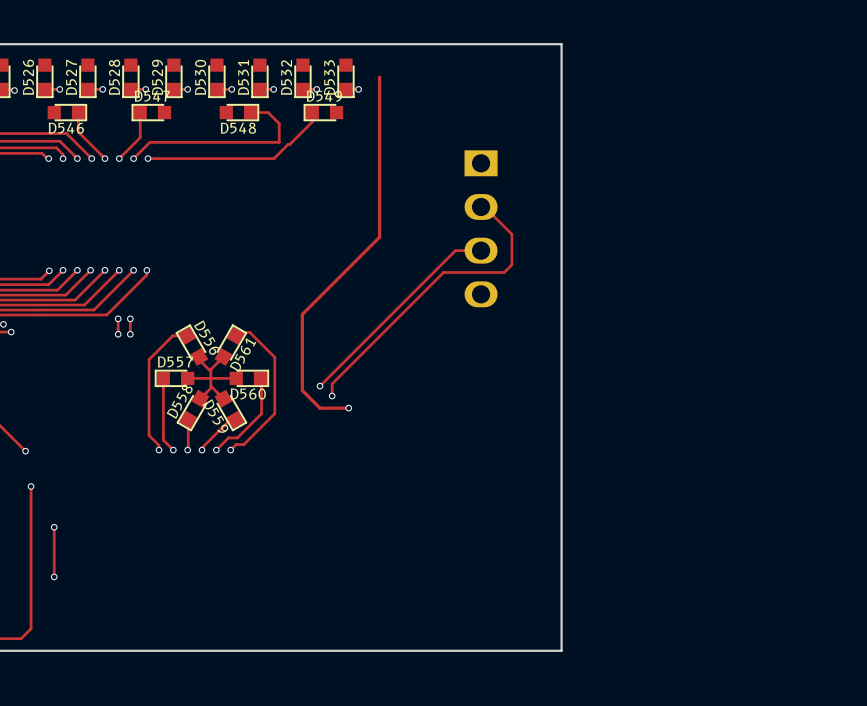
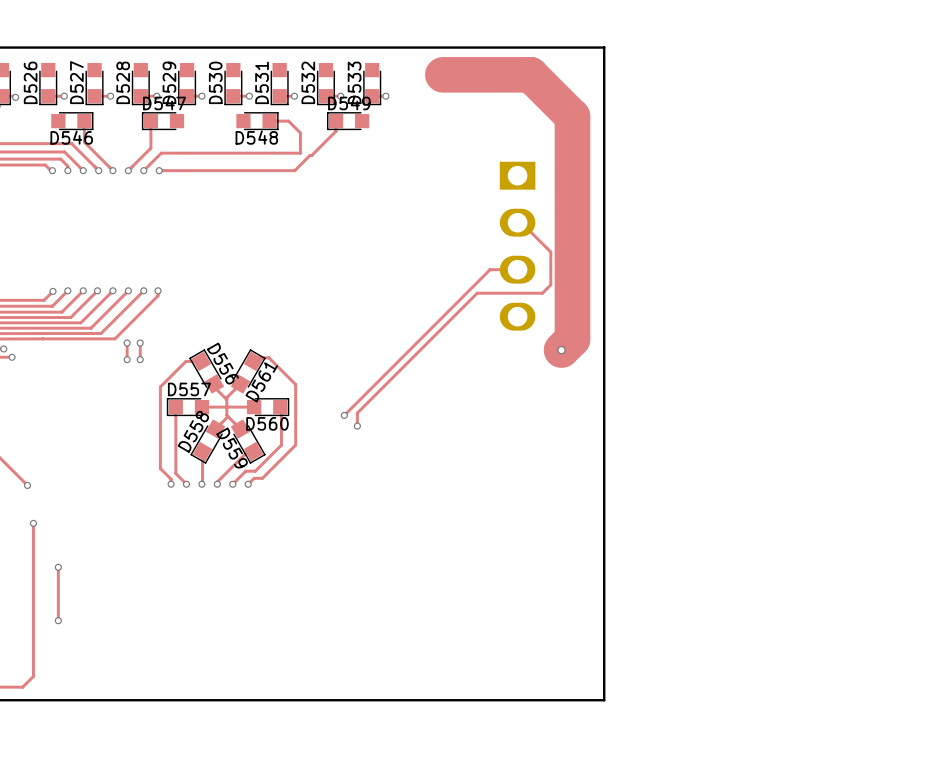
track: none -> (442, 74) (530, 74) (572, 116) (572, 339) (561, 350)
track: (379, 77) (379, 237) (302, 314) (302, 390) (320, 408) (348, 408) -> none
via: none -> (561, 350)
via: (348, 408) -> none

